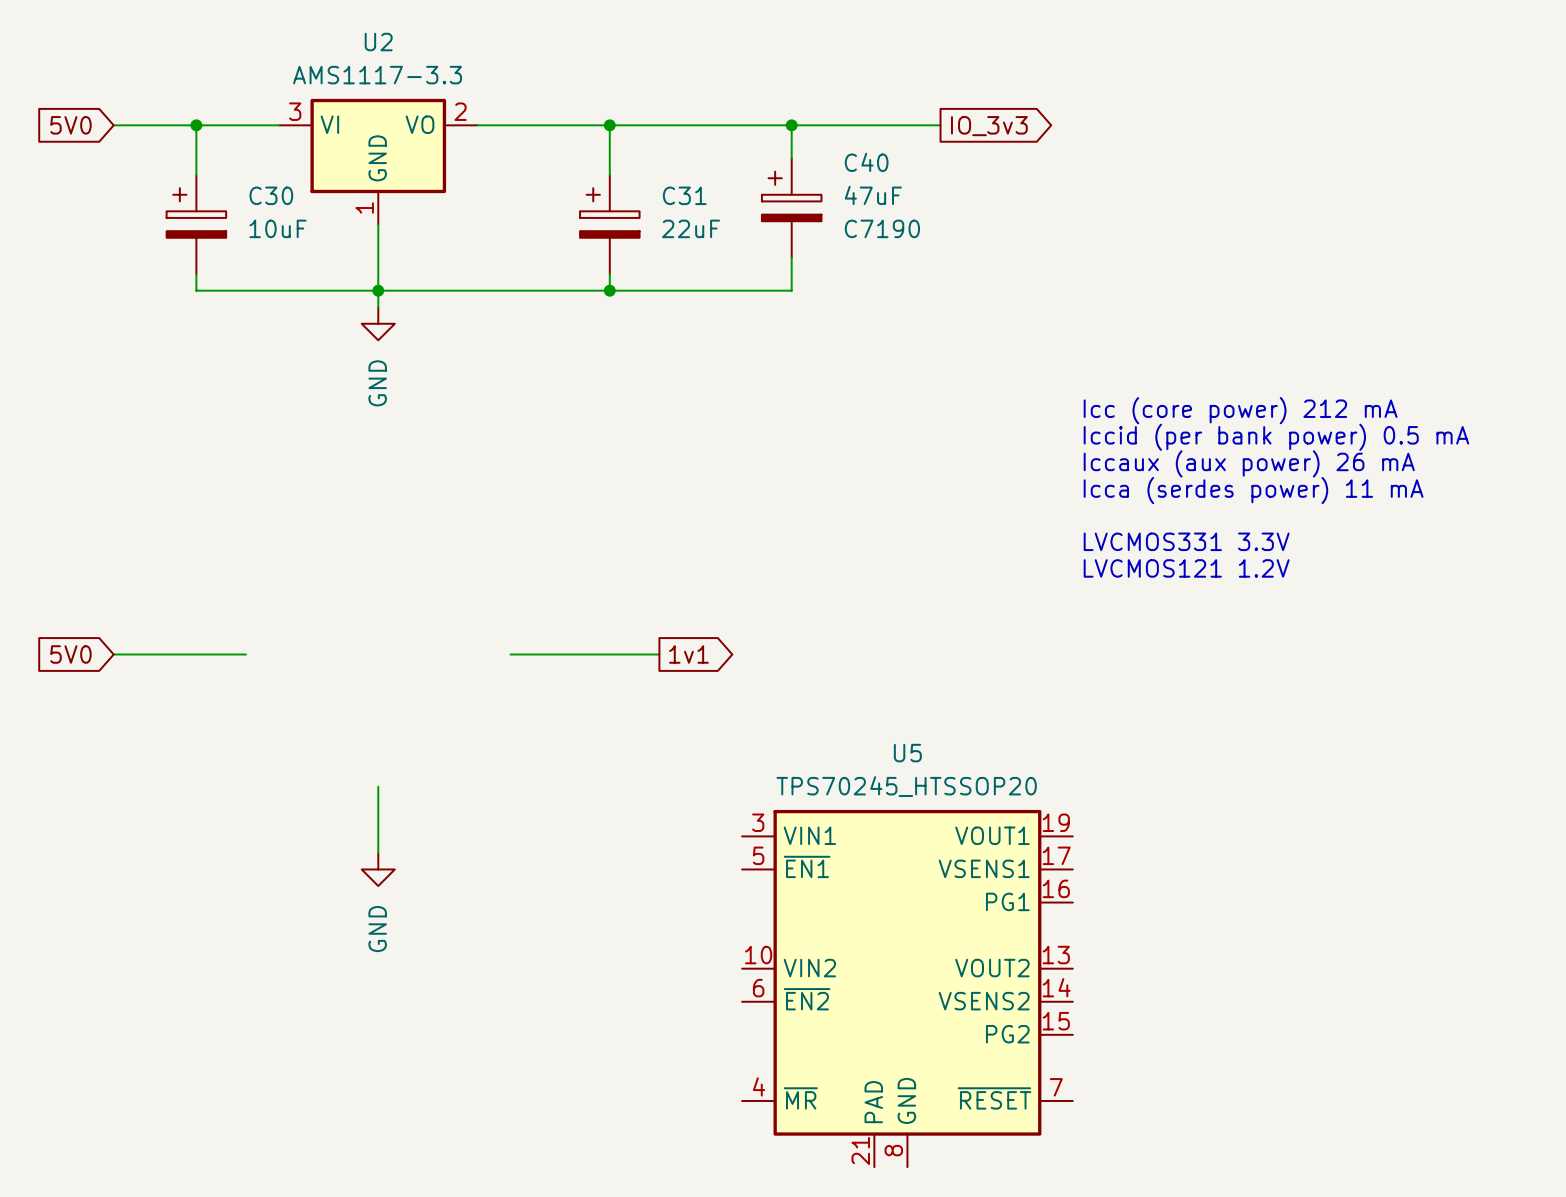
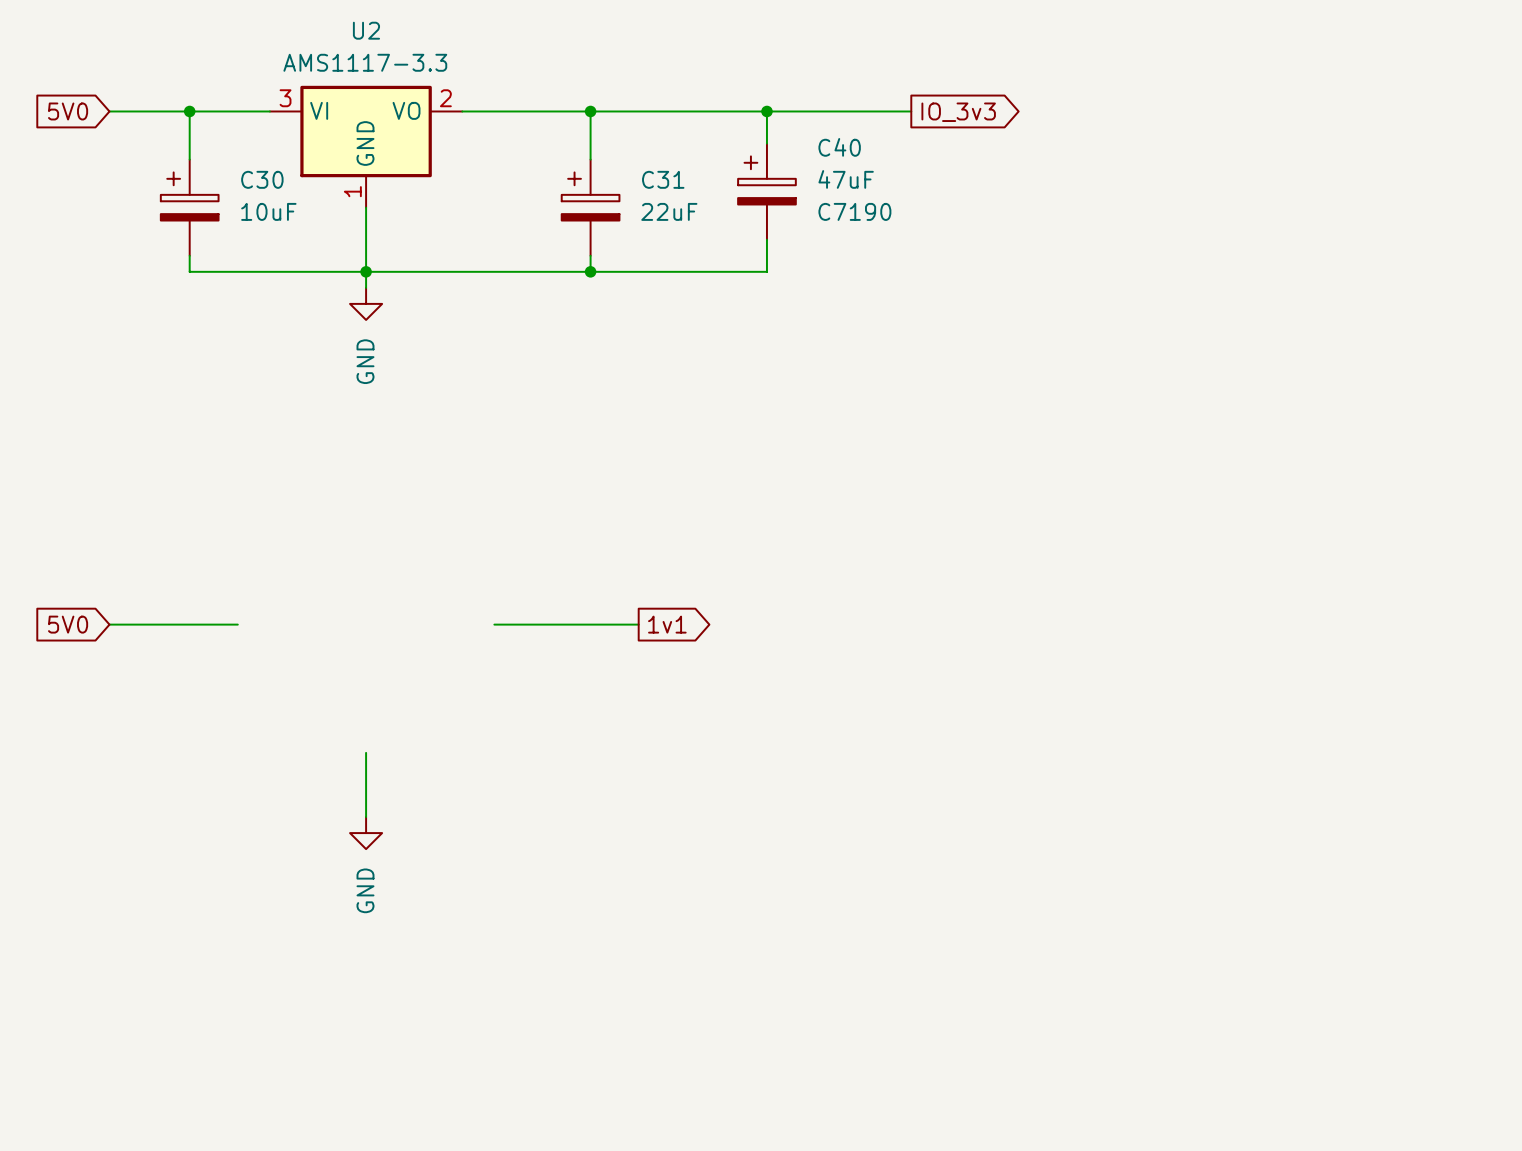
text: Icc (core power) 212 mA (1240, 410) -> none
text: Iccid (per bank power) 0.5 mA (1276, 437) -> none
text: Iccaux (aux power) 26 mA (1249, 463) -> none
text: Icca (serdes power) 11 mA (1253, 490) -> none
text: LVCMOS331 3.3V (1186, 541) -> none
text: LVCMOS121 1.2V (1186, 568) -> none
U5: TPS70245_HTSSOP20 (907, 988) -> none

